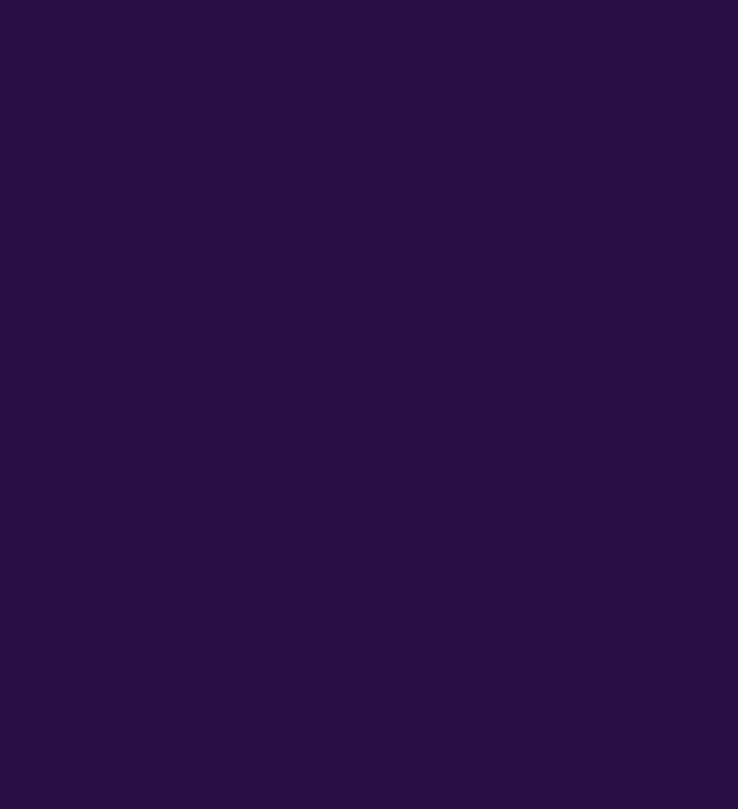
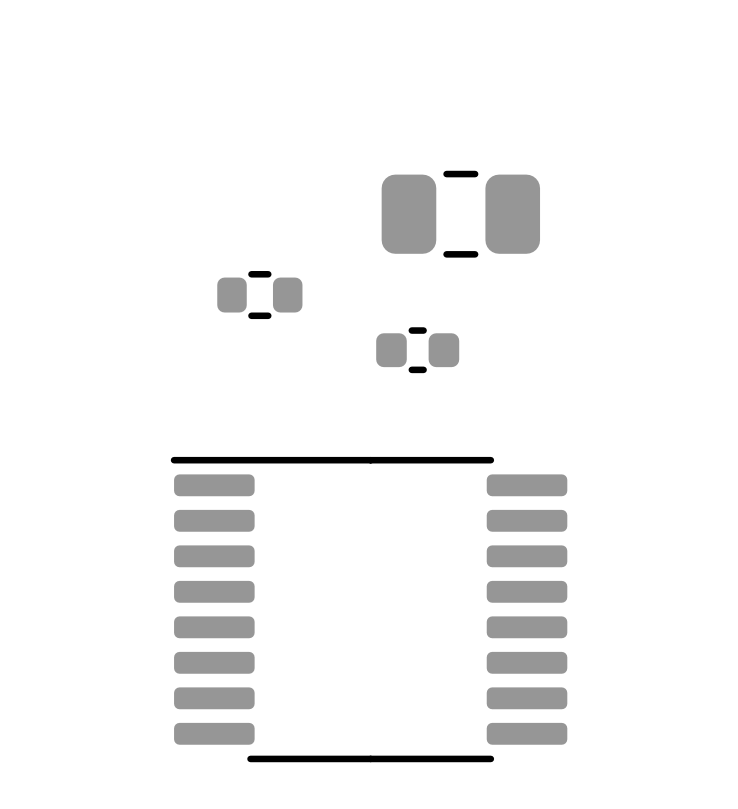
part: none -> (460, 214)
part: none -> (259, 295)
part: none -> (417, 350)
part: none -> (369, 609)

